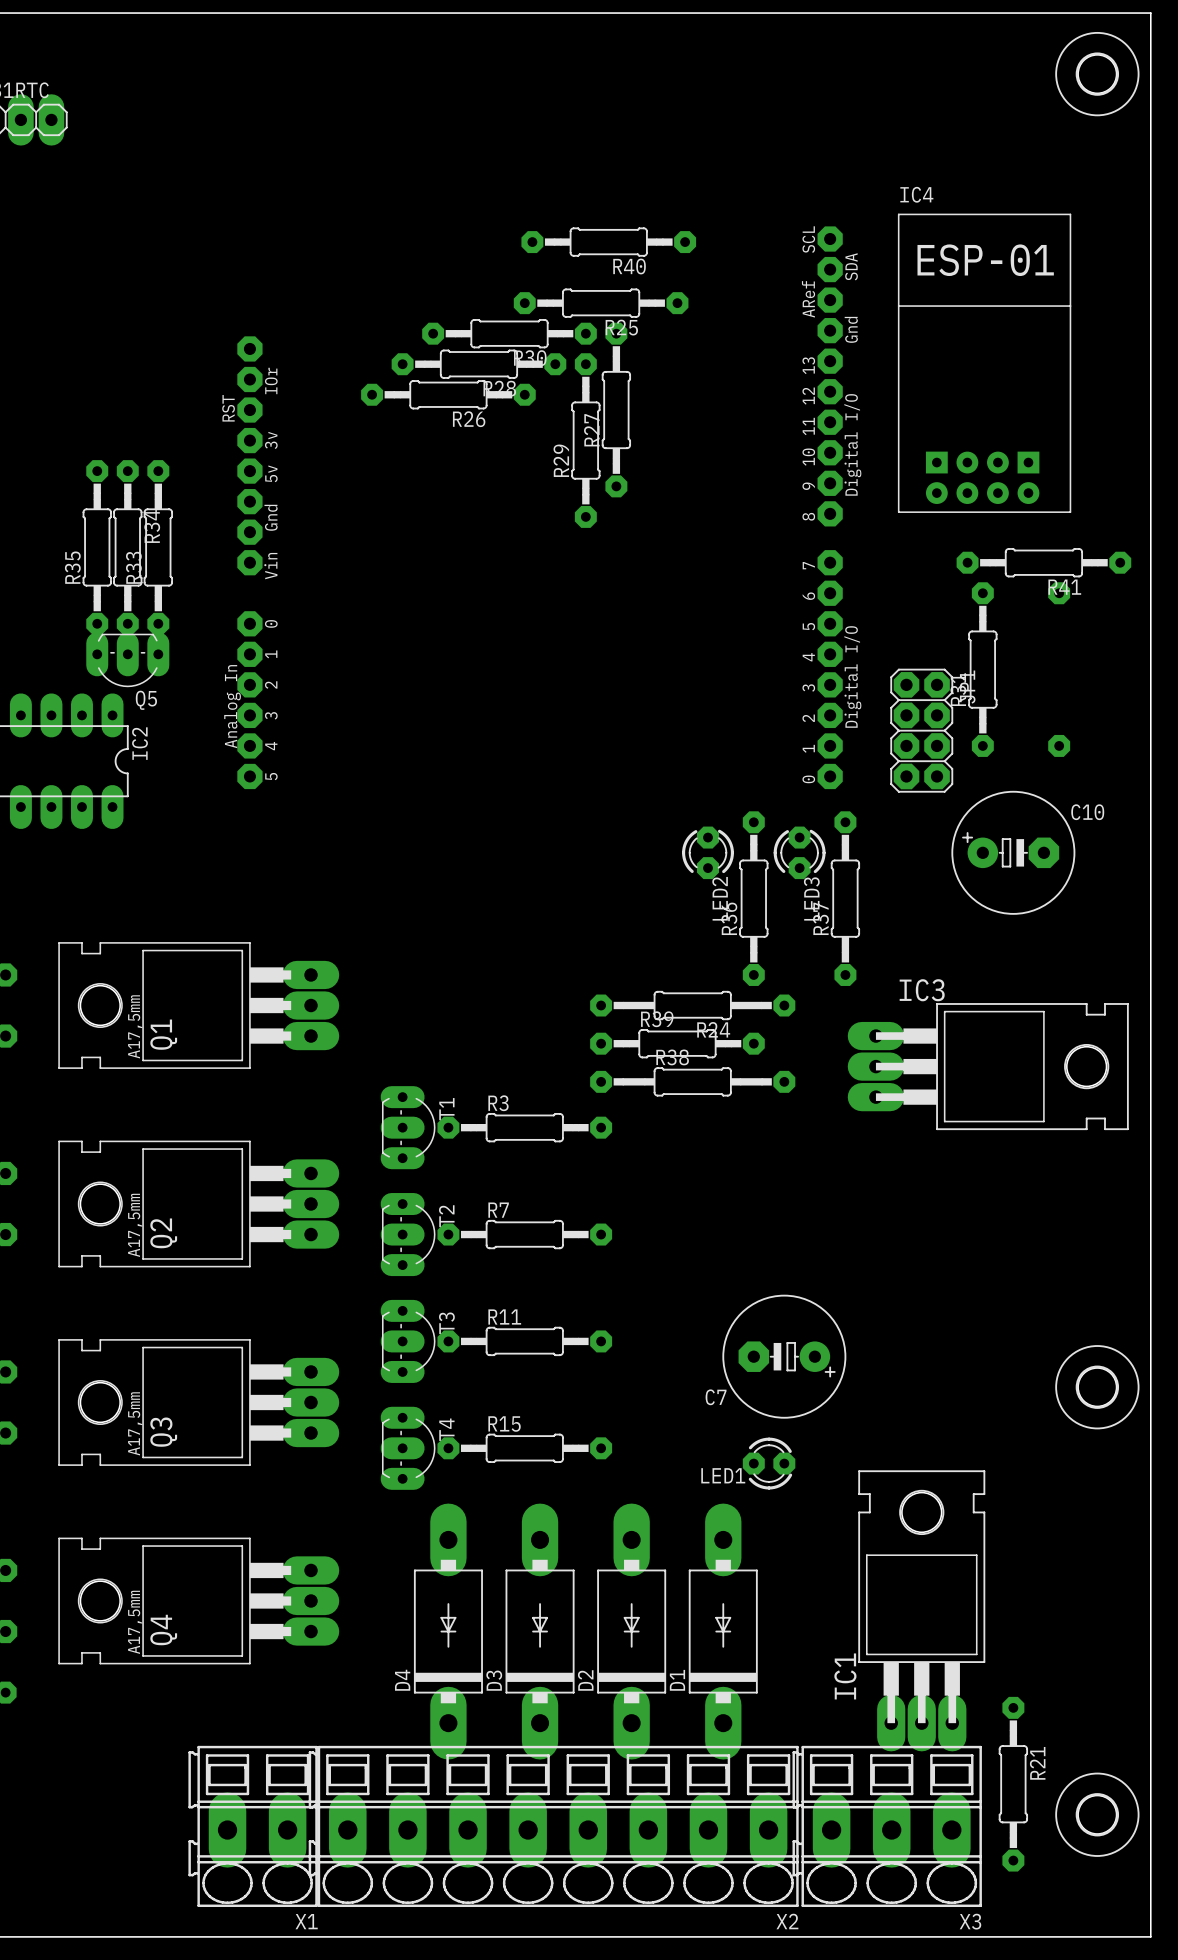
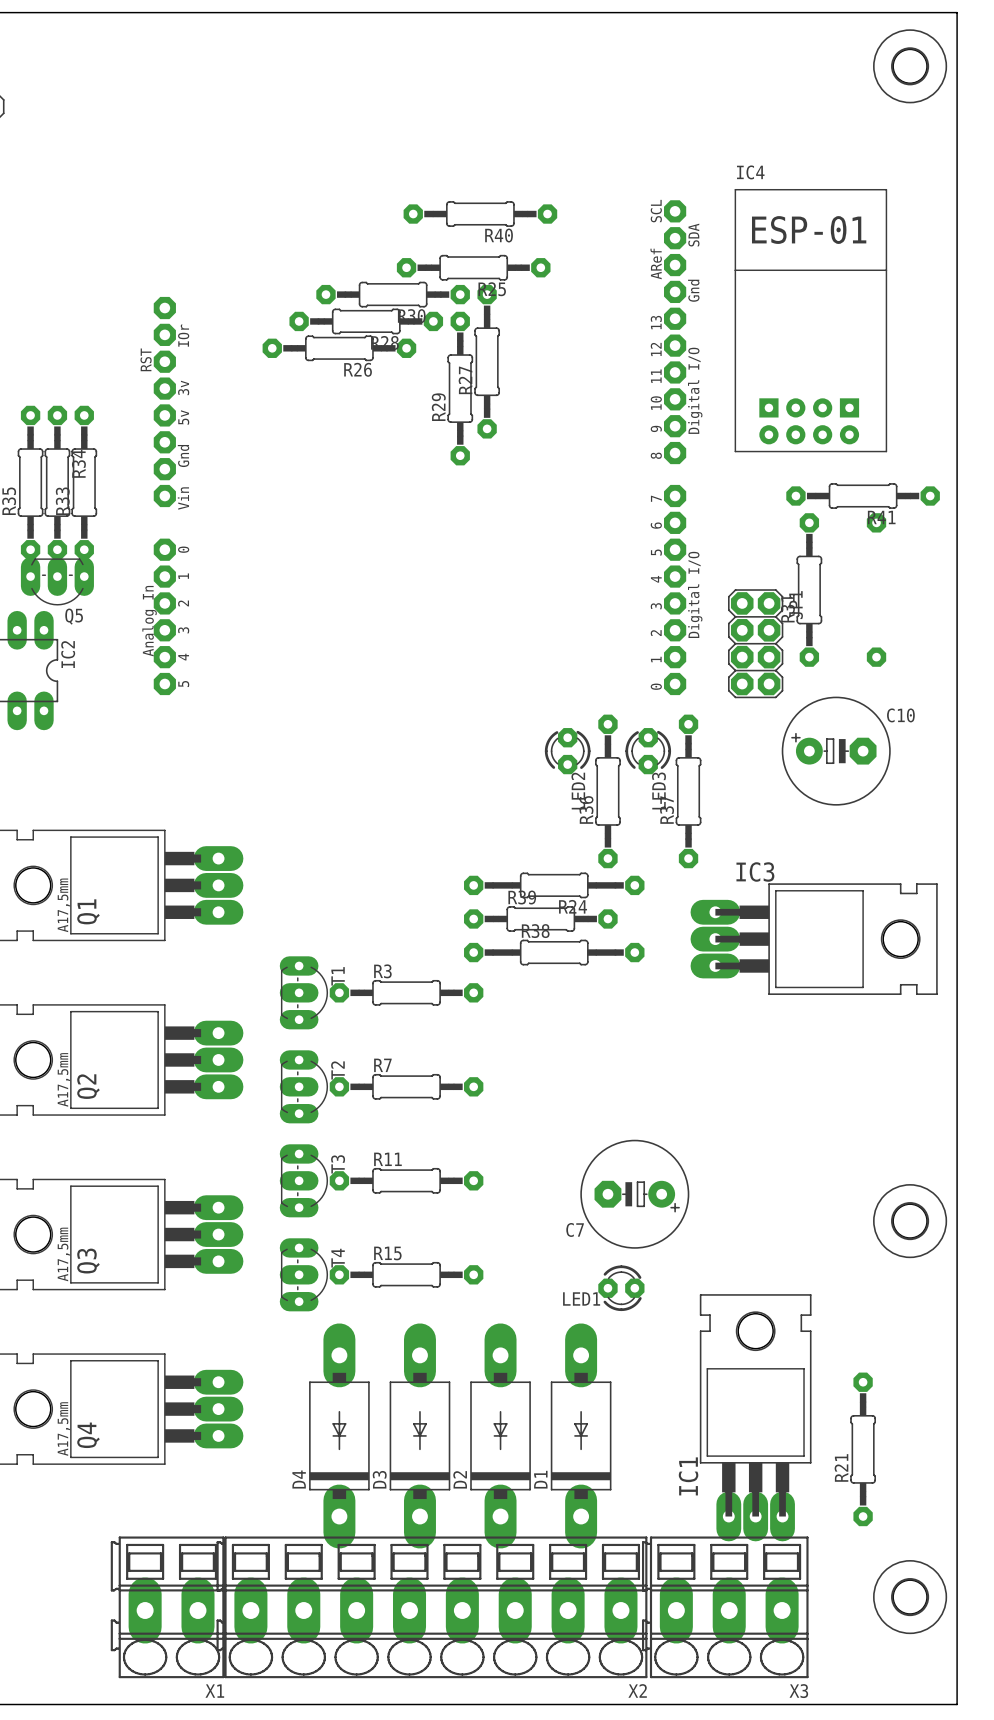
R21 name position: R21 (1037, 1763) -> R21 (841, 1467)
R21 position: (1013, 1784) -> (863, 1449)

